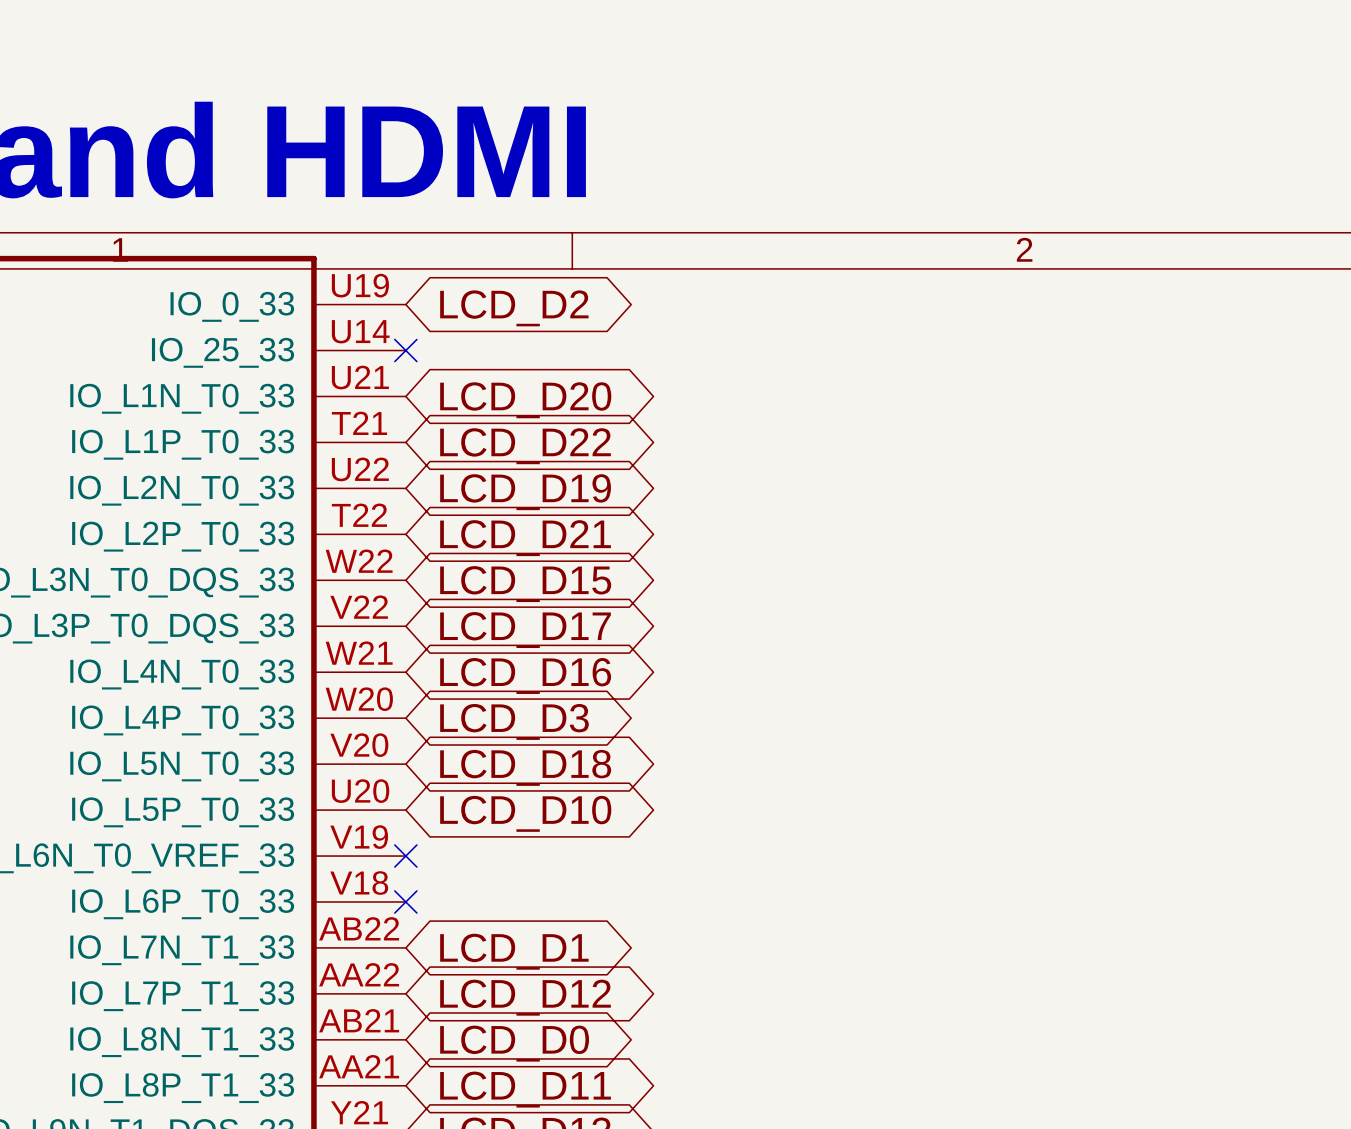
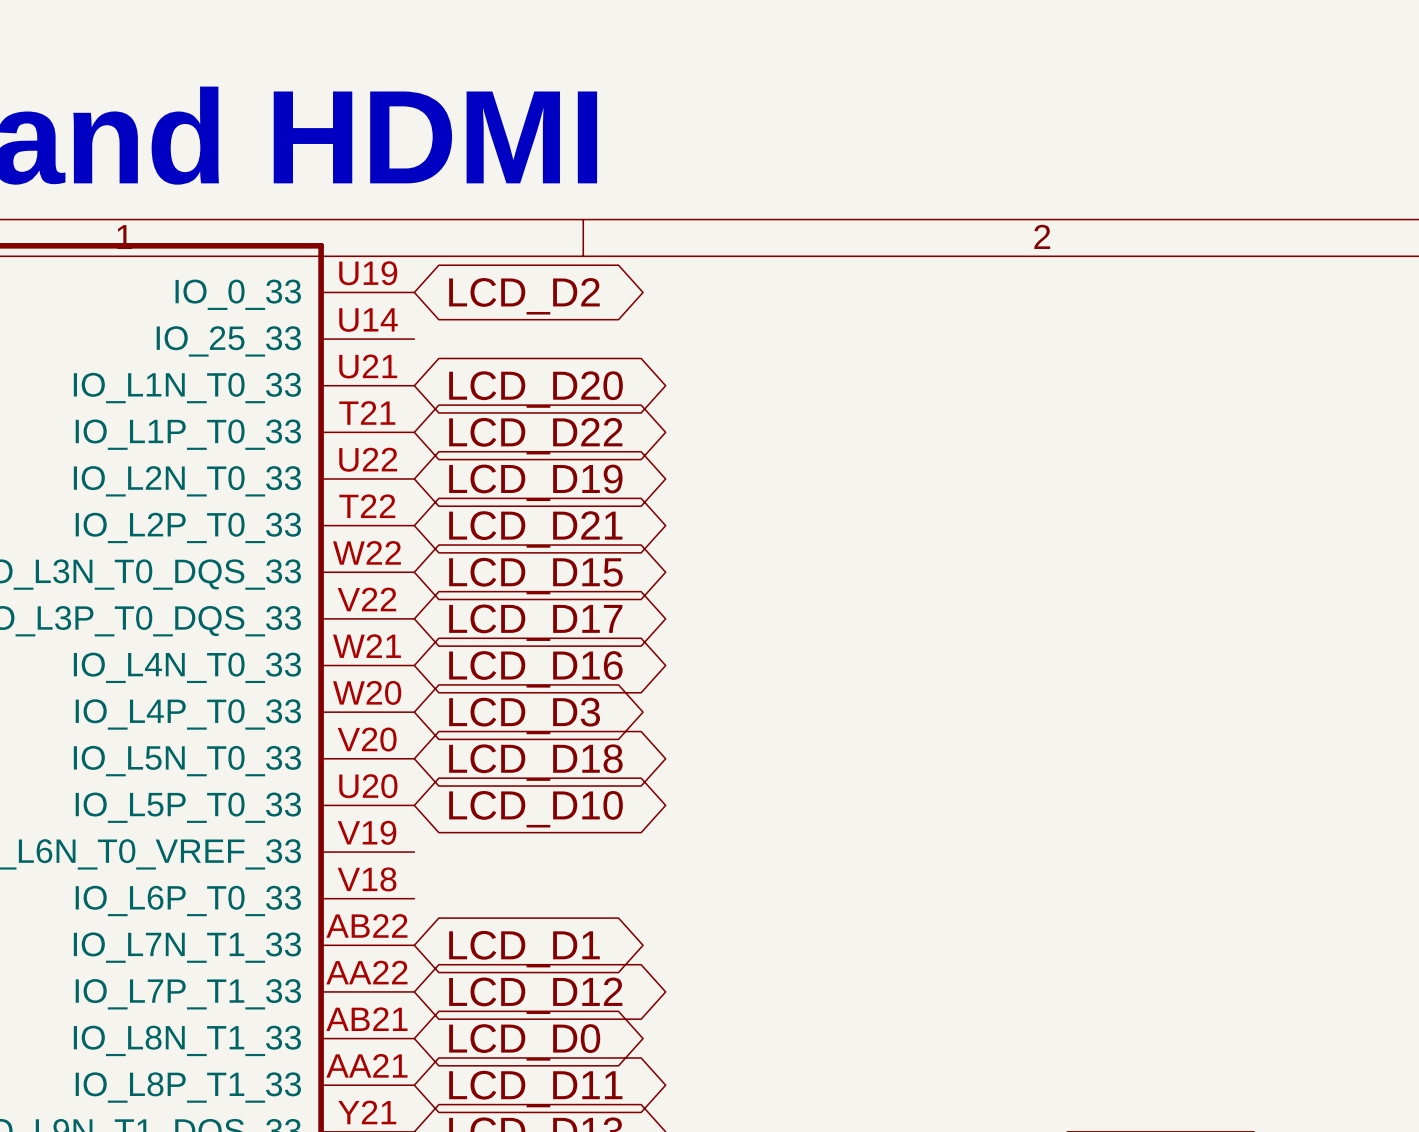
no-connect mark: (405, 350) -> none
no-connect mark: (405, 856) -> none
no-connect mark: (405, 901) -> none

